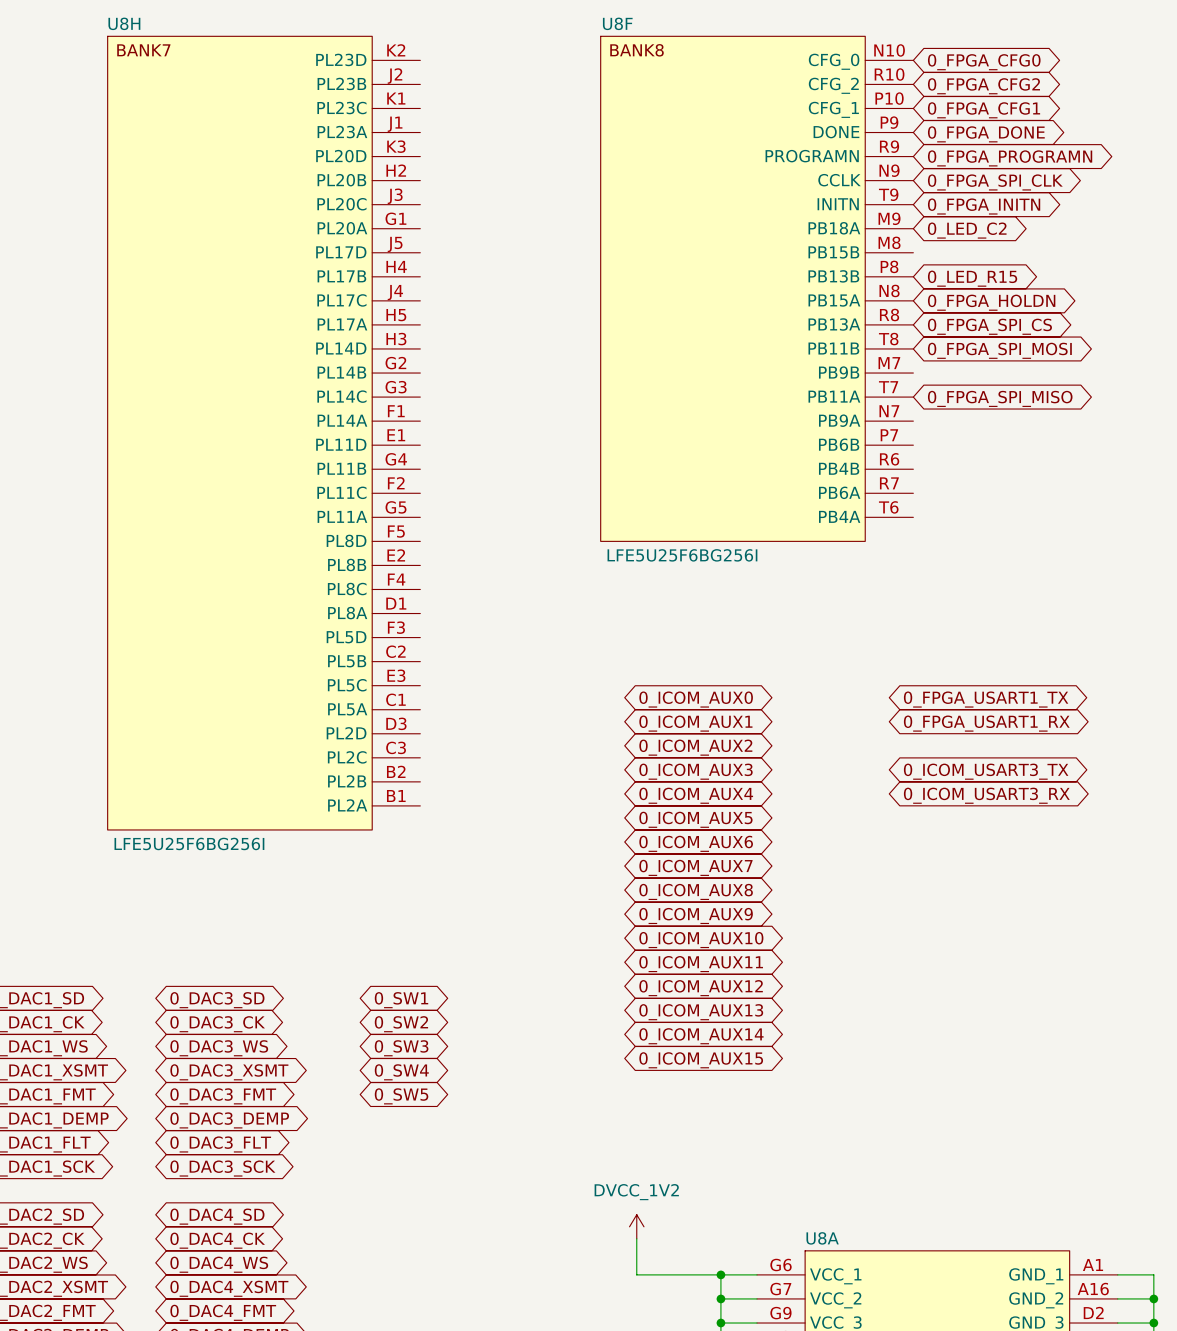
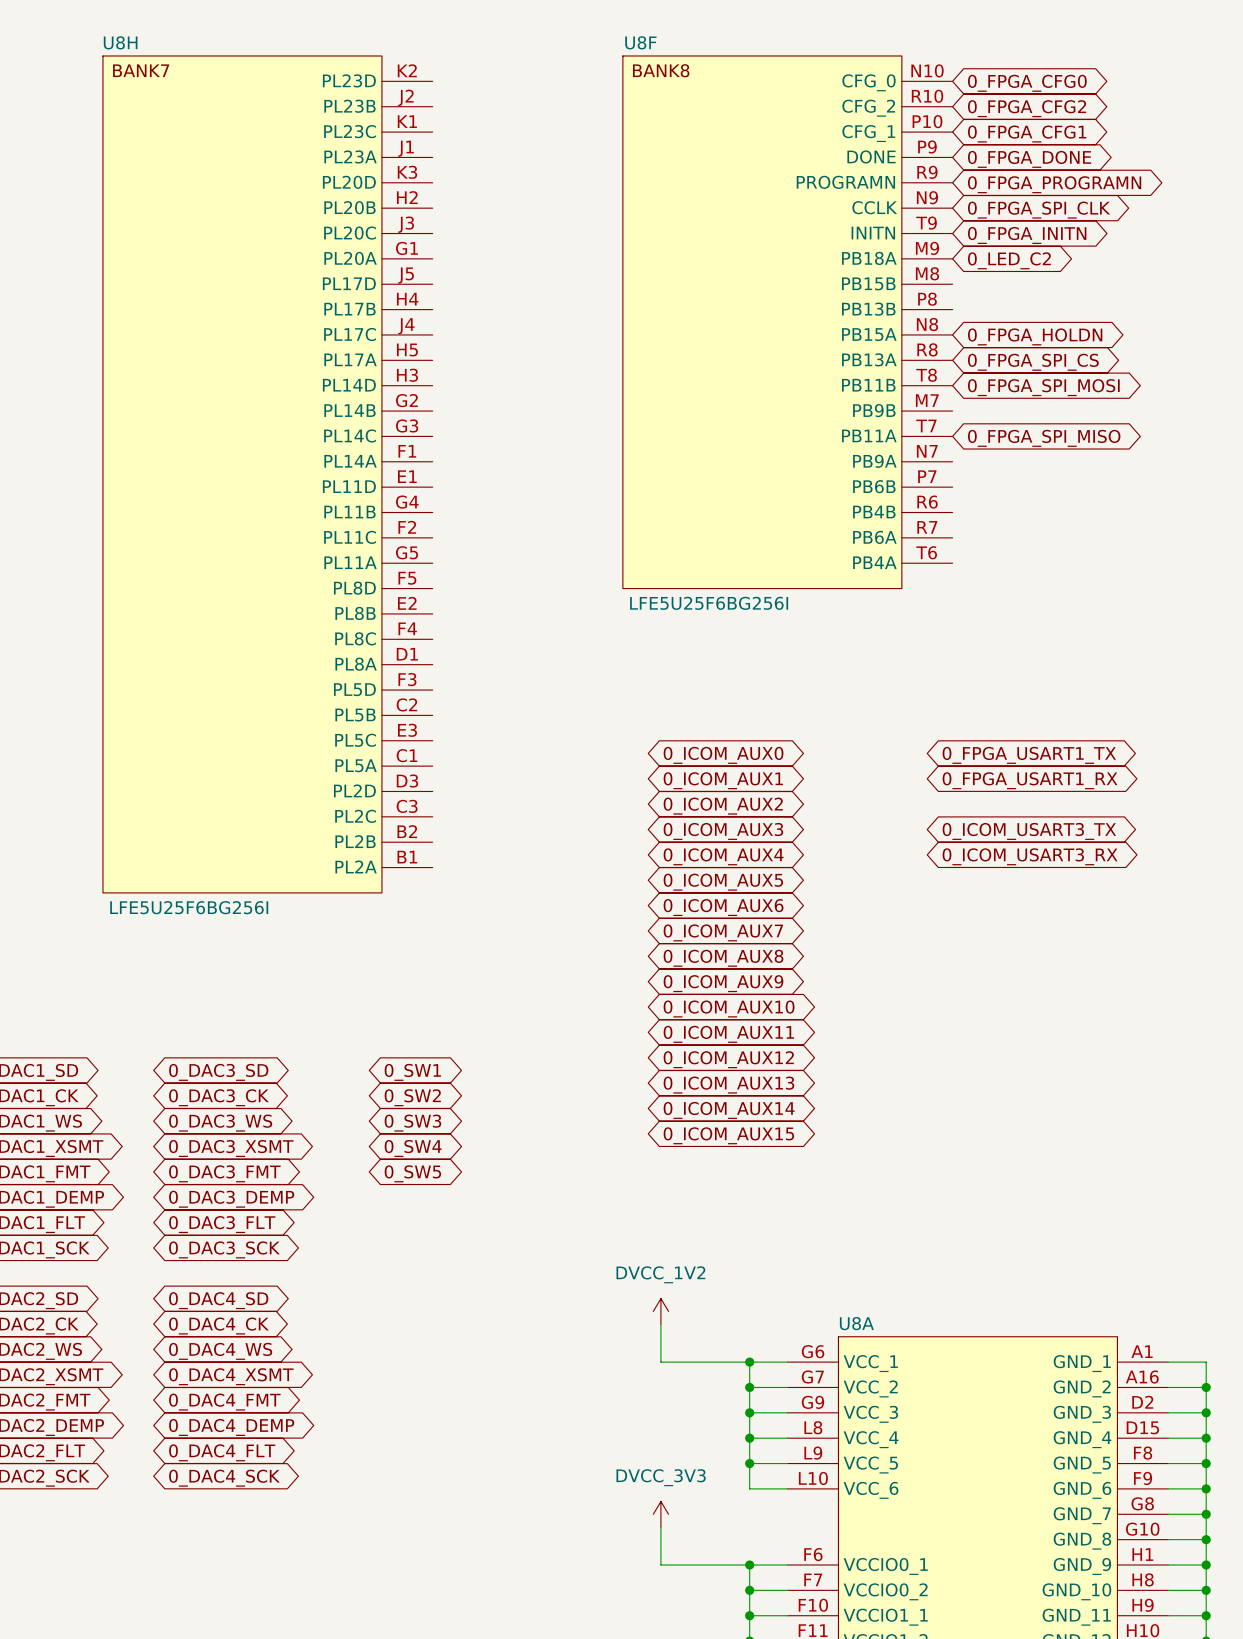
global label: 0_LED_R15 (972, 278) -> none

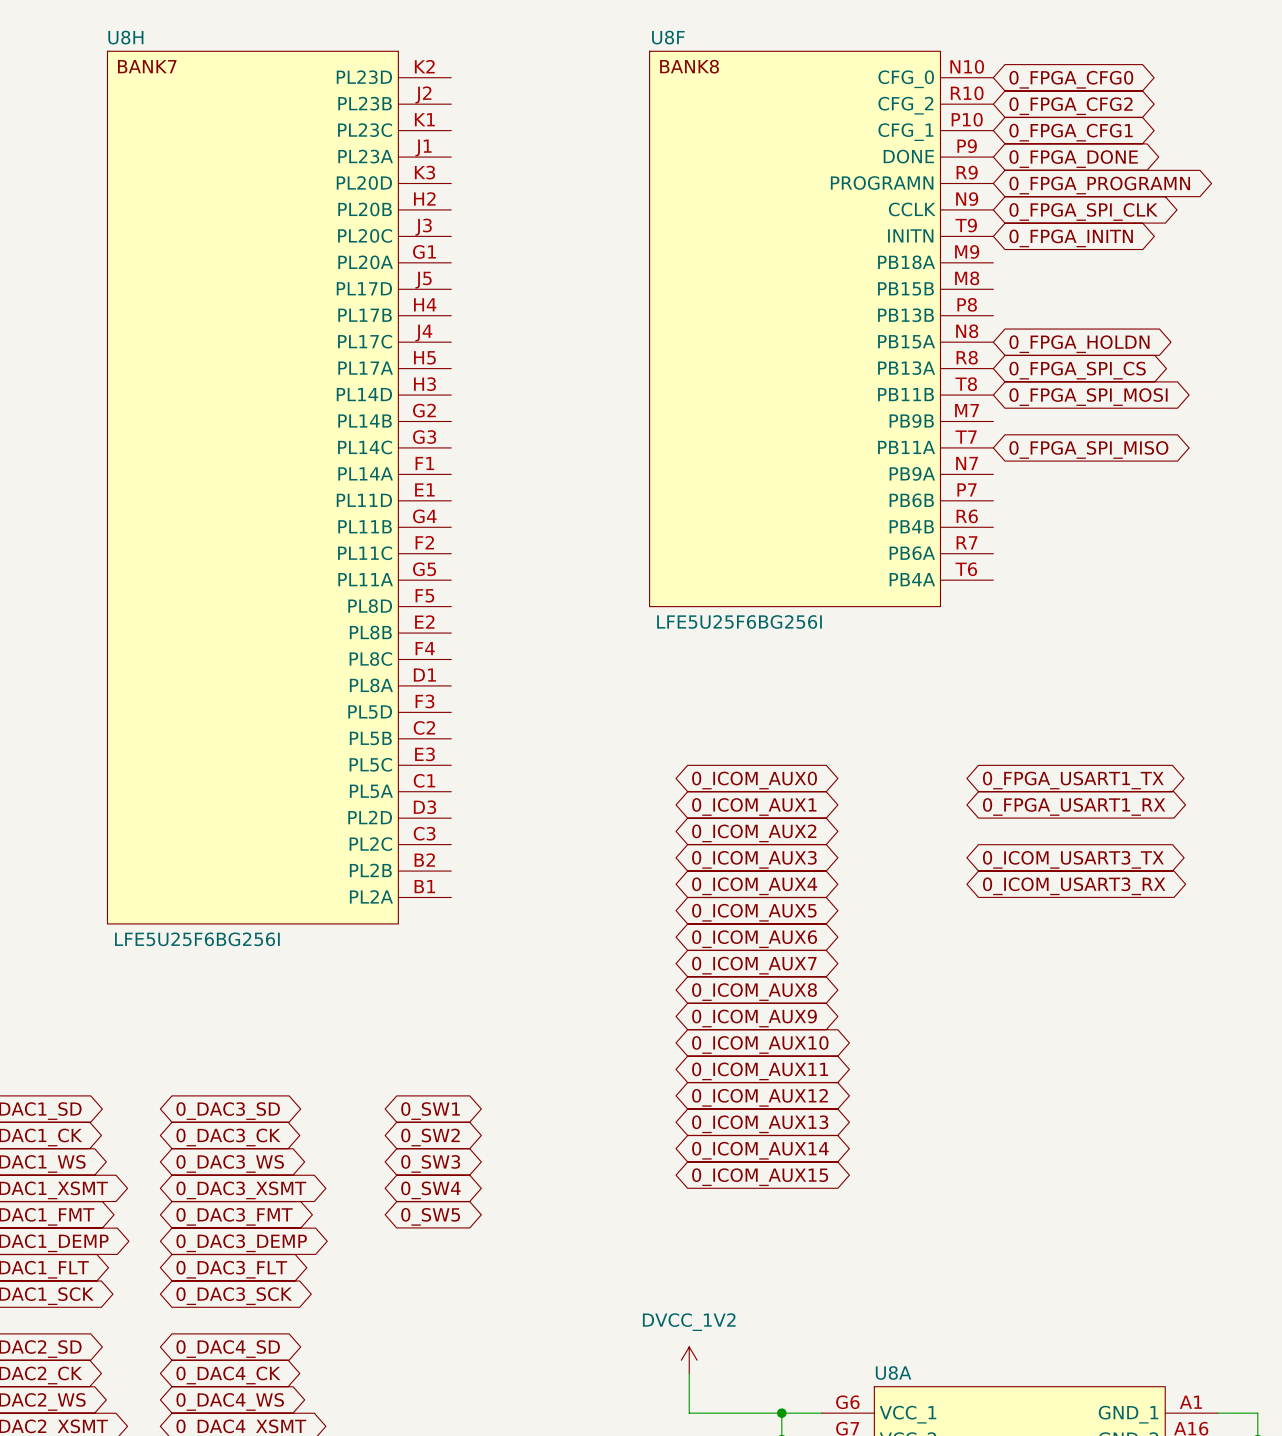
global label: 0_LED_C2 (1009, 260) -> none

